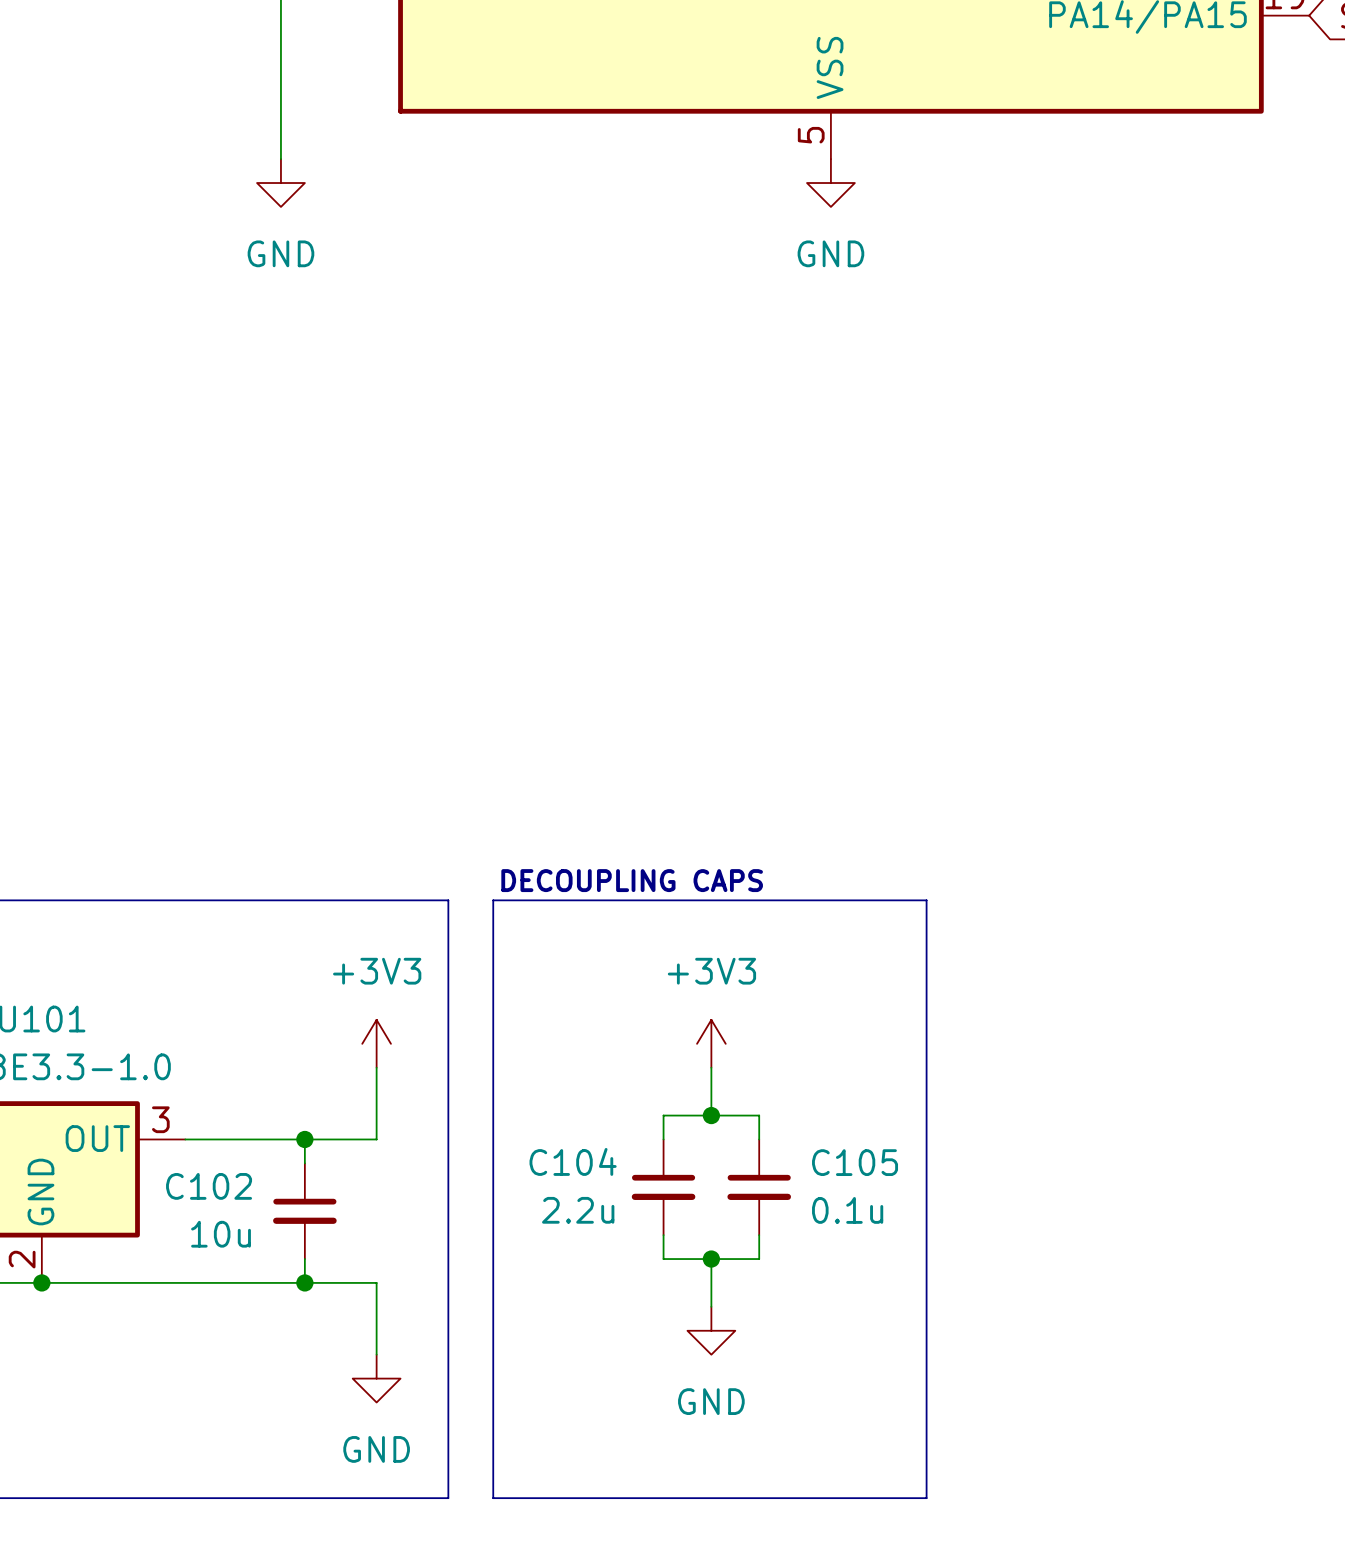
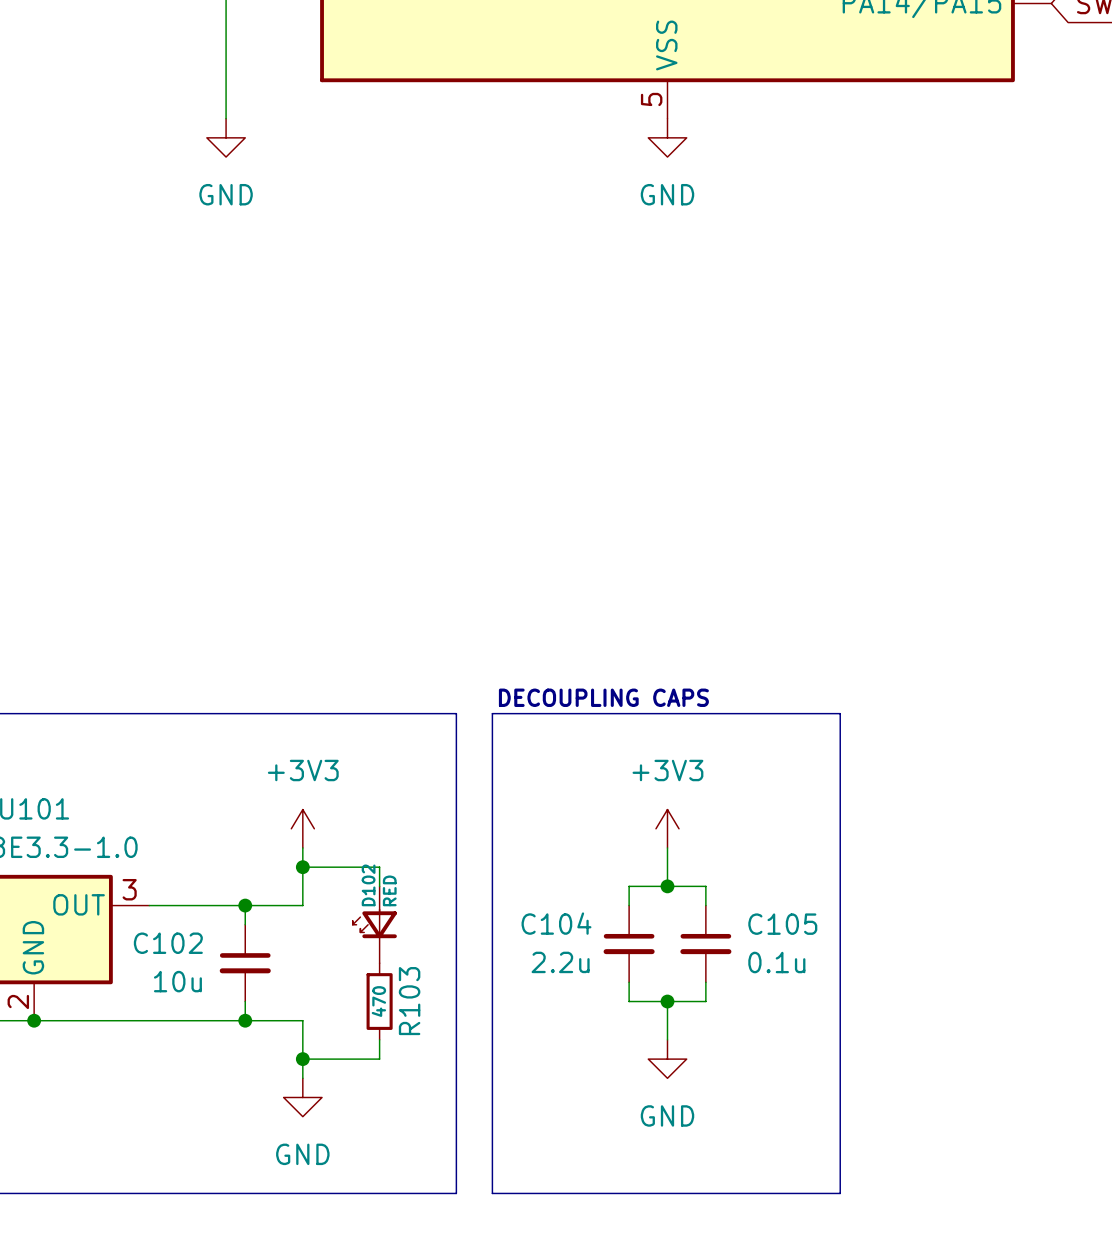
text position: DECOUPLING CAPS (632, 880) -> DECOUPLING CAPS (603, 697)
line: (448, 900) (448, 1498) -> (360, 713) (396, 713)
line: (493, 900) (493, 1498) -> (360, 1193) (396, 1193)
line: (567, 900) (612, 900) -> (456, 713) (456, 1193)
line: (926, 900) (926, 1498) -> (744, 713) (840, 713) (840, 1193) (744, 1193)
power symbol position: +3V3 (711, 1043) -> +3V3 (667, 828)
wire: (711, 1067) (711, 1115) -> (667, 847) (667, 886)
wire: none -> (302, 867) (379, 867) (379, 886)
junction: none -> (302, 867)
junction: (711, 1115) -> none
junction: none -> (667, 886)
wire: (663, 1139) (663, 1115) (759, 1115) (759, 1139) -> (629, 905) (629, 886) (705, 886) (705, 905)
D102: none -> RED (374, 924)
C104 position: (663, 1187) -> (629, 943)
C105 position: (759, 1187) -> (705, 943)
wire: (663, 1235) (663, 1259) (759, 1259) (759, 1235) -> (629, 982) (629, 1001) (705, 1001) (705, 982)
R103: none -> 470 (379, 1001)
wire: (711, 1259) (711, 1306) -> (667, 1001) (667, 1039)
junction: (711, 1259) -> none
junction: none -> (667, 1001)
wire: none -> (379, 1039) (379, 1059) (302, 1059)
junction: none -> (302, 1059)
power symbol position: GND (711, 1330) -> GND (667, 1059)
line: (567, 1498) (612, 1498) -> (492, 713) (492, 1193)

